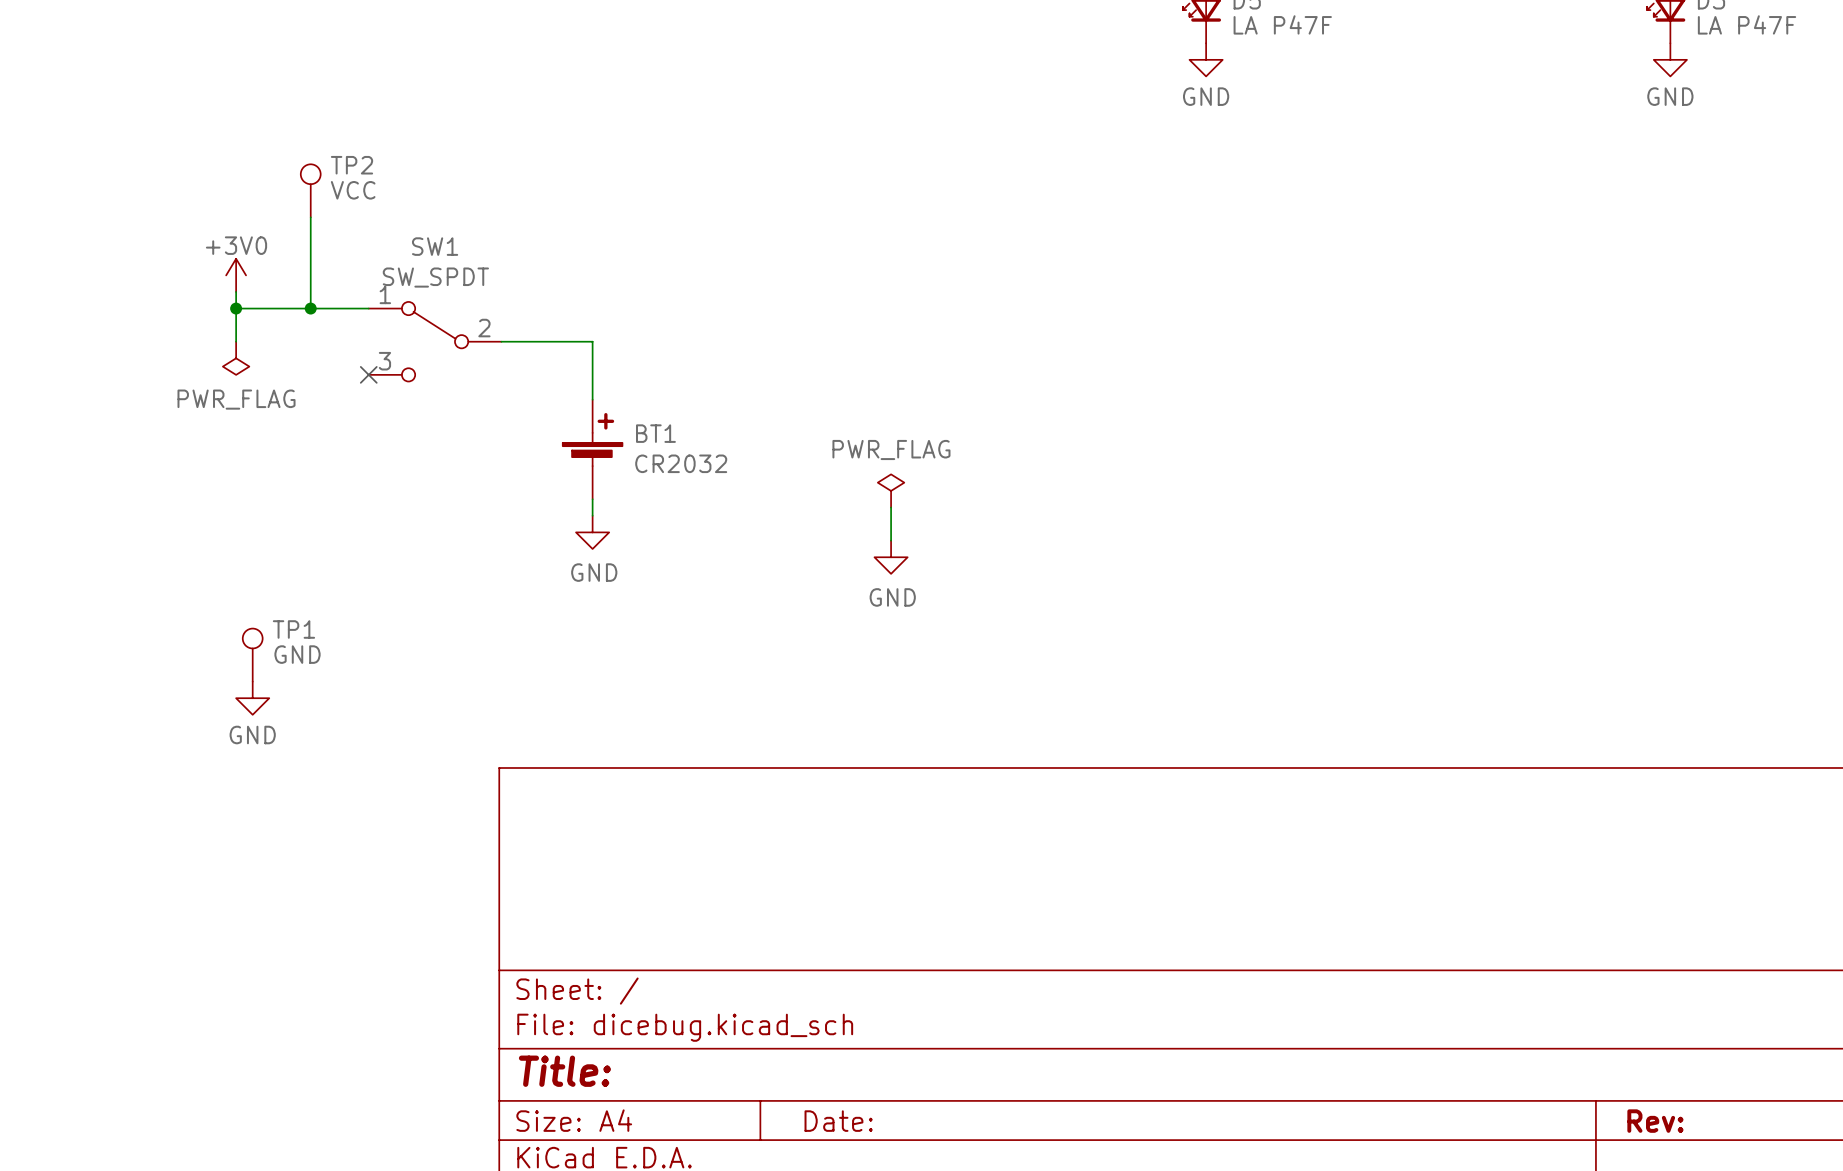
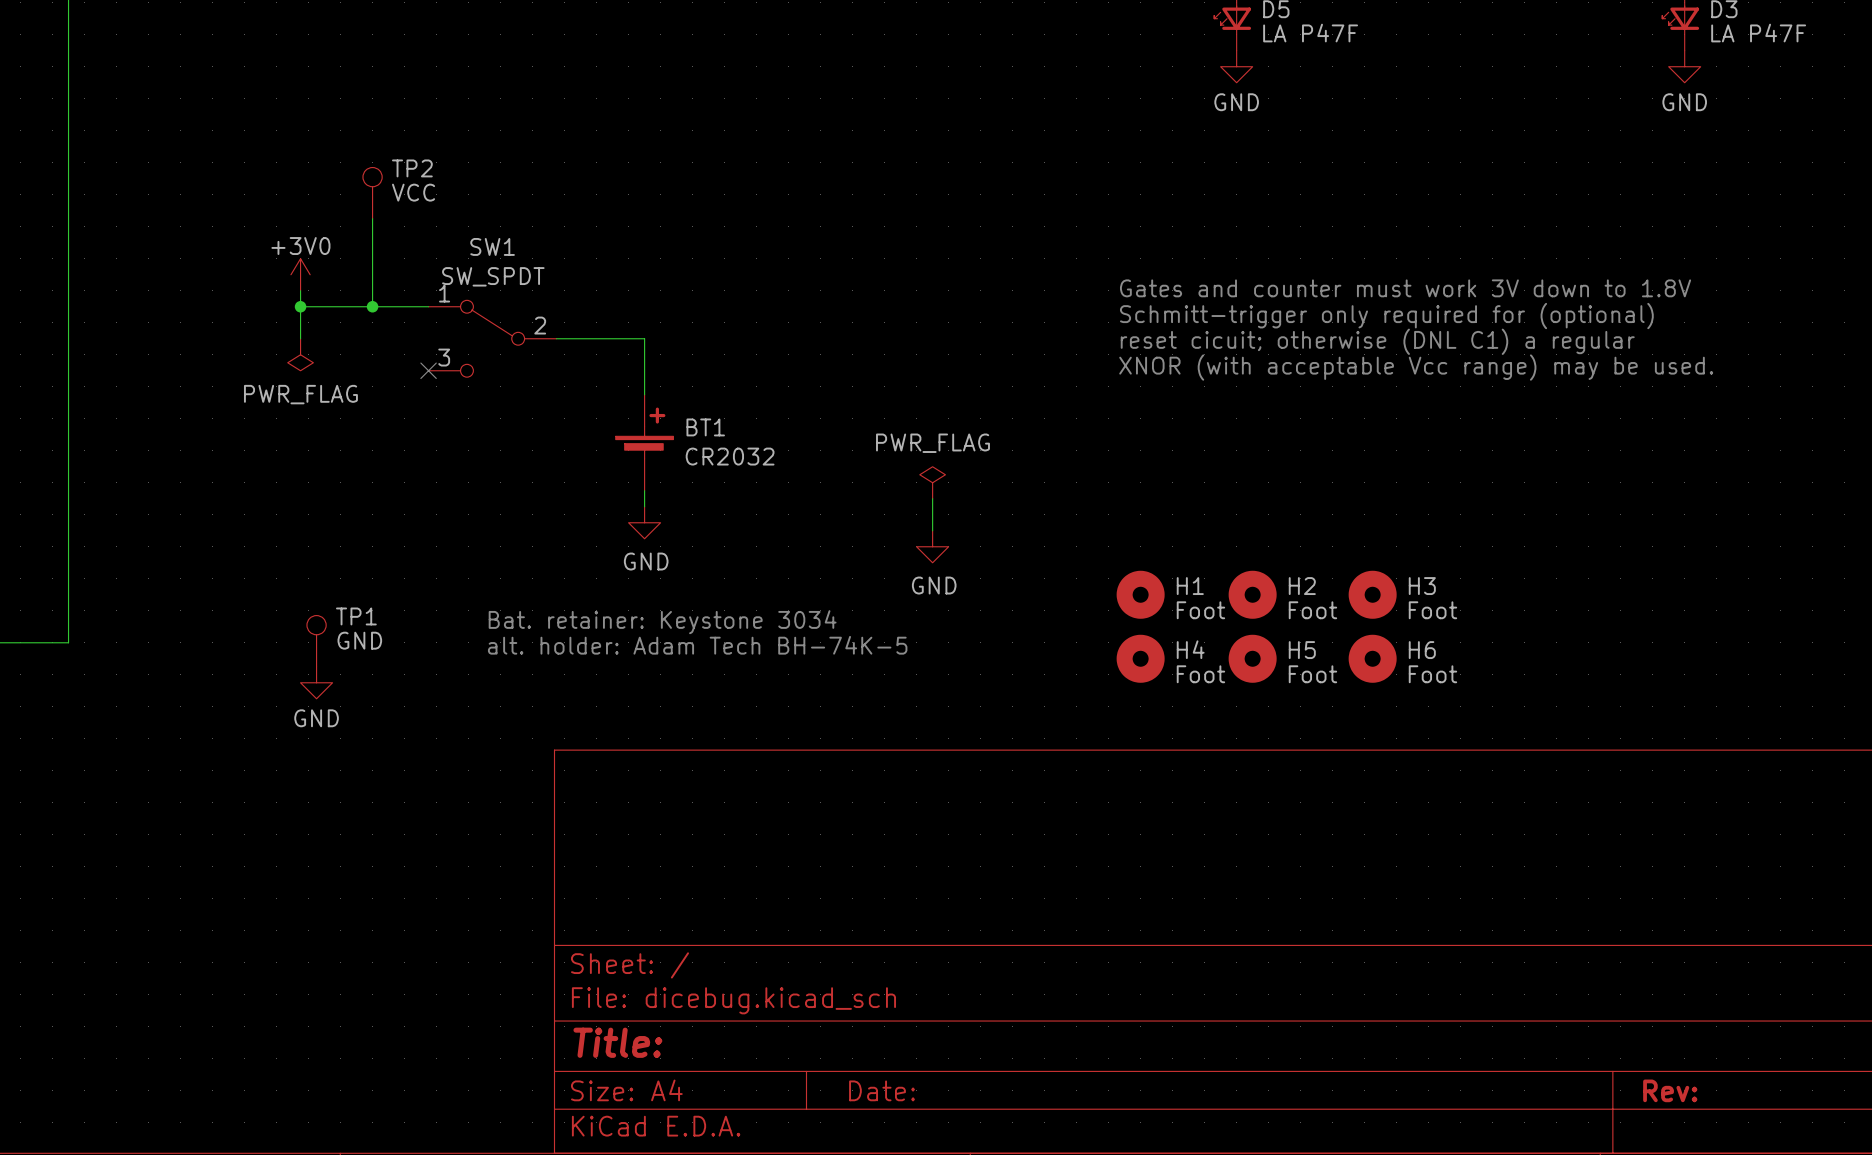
text: none -> Gates and counter must work 3V down to 1.8V (1405, 288)
text: none -> Schmitt-trigger only required for (optional) (1386, 316)
text: none -> reset cicuit; otherwise (DNL C1) a regular (1377, 341)
text: none -> XNOR (with acceptable Vcc range) may be used. (1416, 367)
H1: none -> Foot (1140, 594)
H2: none -> Foot (1252, 594)
H3: none -> Foot (1372, 594)
text: none -> Bat. retainer: Keystone 3034 (662, 622)
text: none -> alt. holder: Adam Tech BH-74K-5 (697, 645)
H4: none -> Foot (1140, 658)
H5: none -> Foot (1252, 658)
H6: none -> Foot (1372, 658)

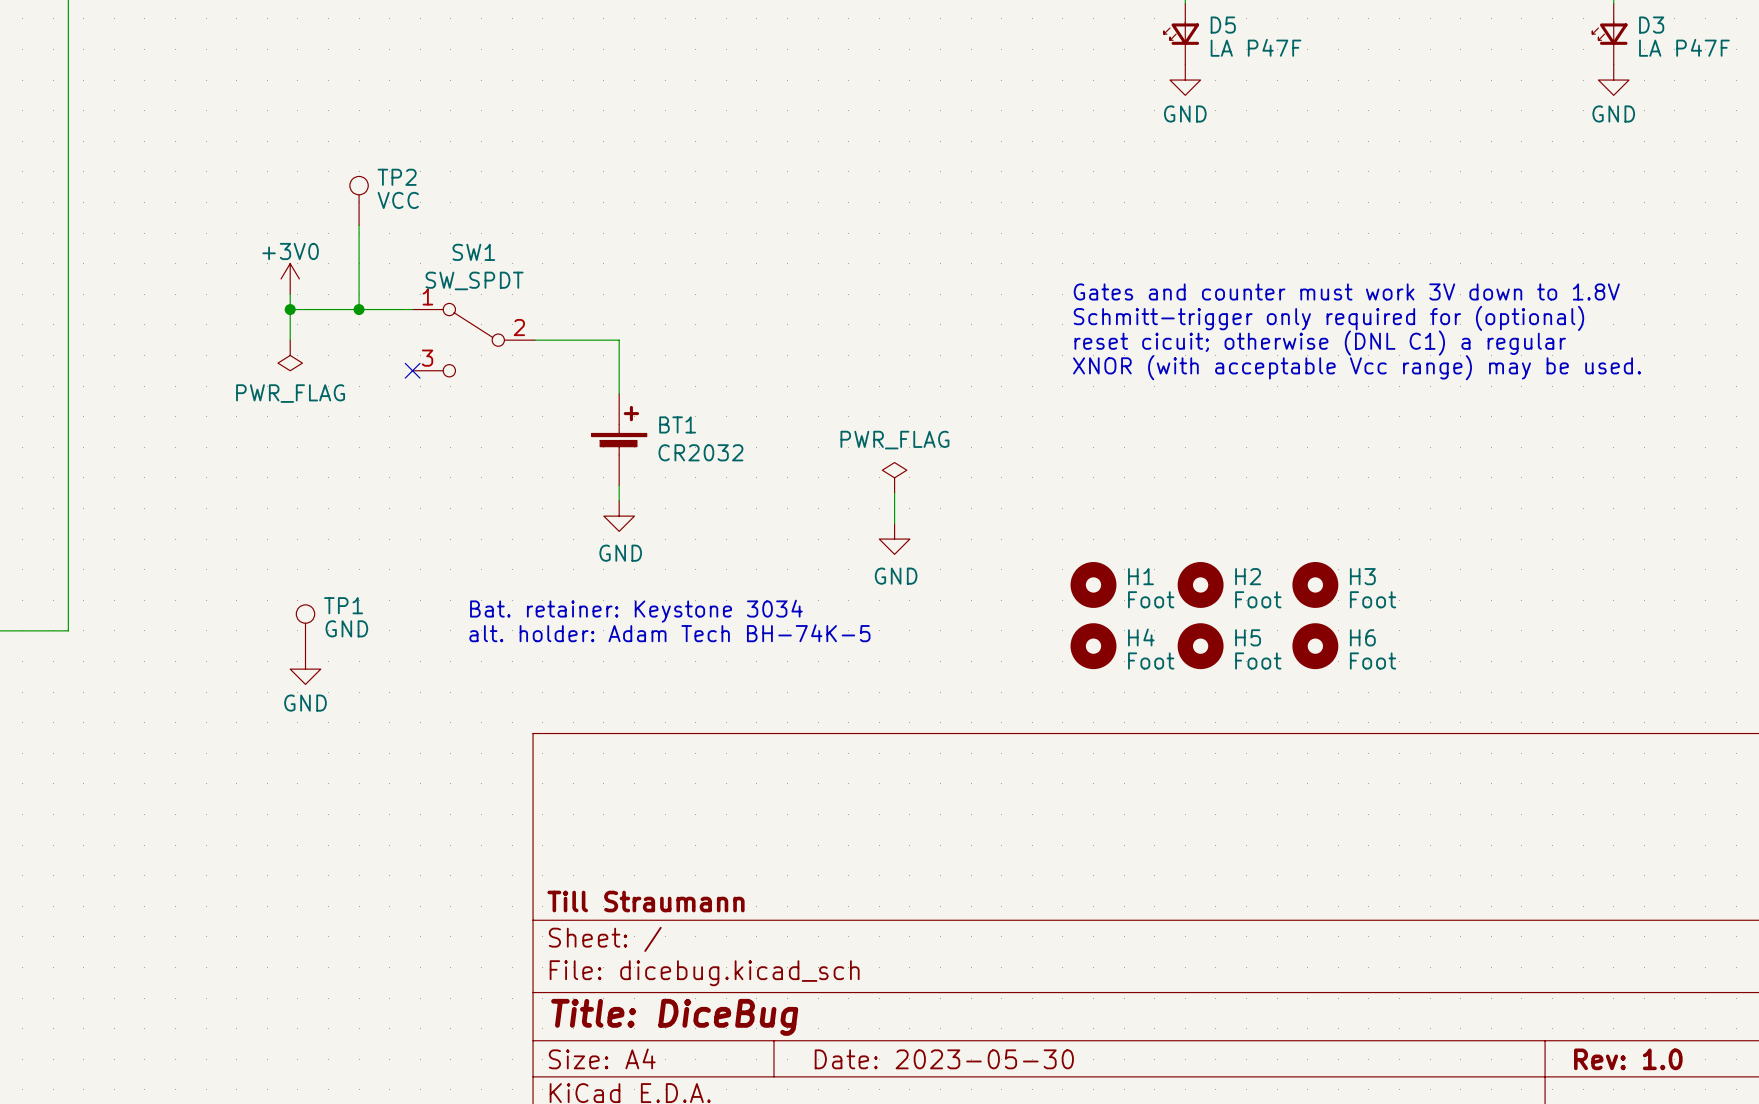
title block: none -> Till Straumann (645, 901)
title block: Title: (617, 1042) -> Title: DiceBug (674, 1017)
title block: Date: (882, 1090) -> Date: 2023-05-30 (944, 1059)
title block: Rev: (1670, 1090) -> Rev: 1.0 (1628, 1059)

